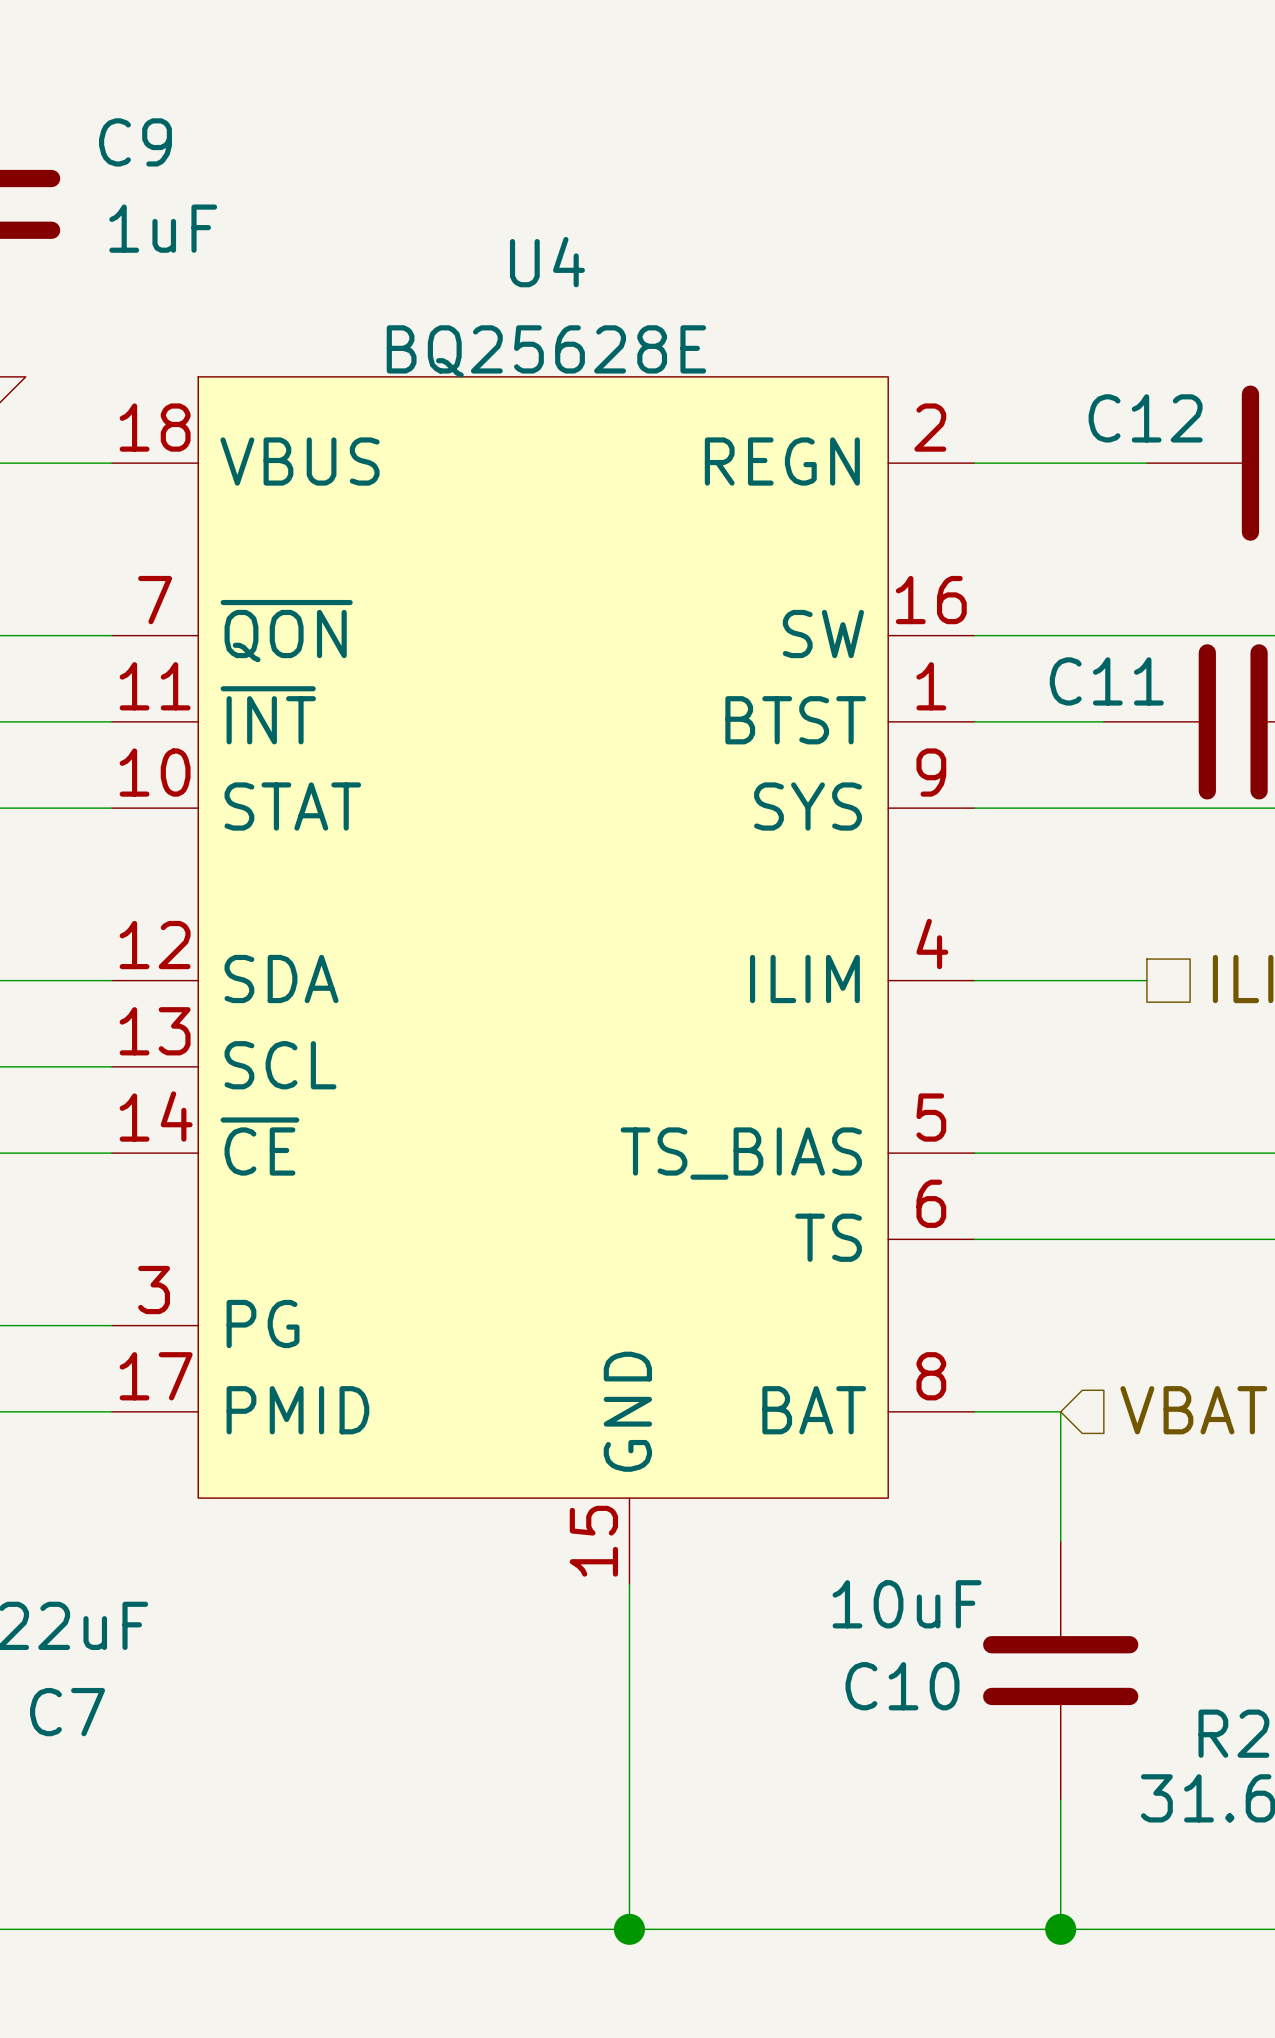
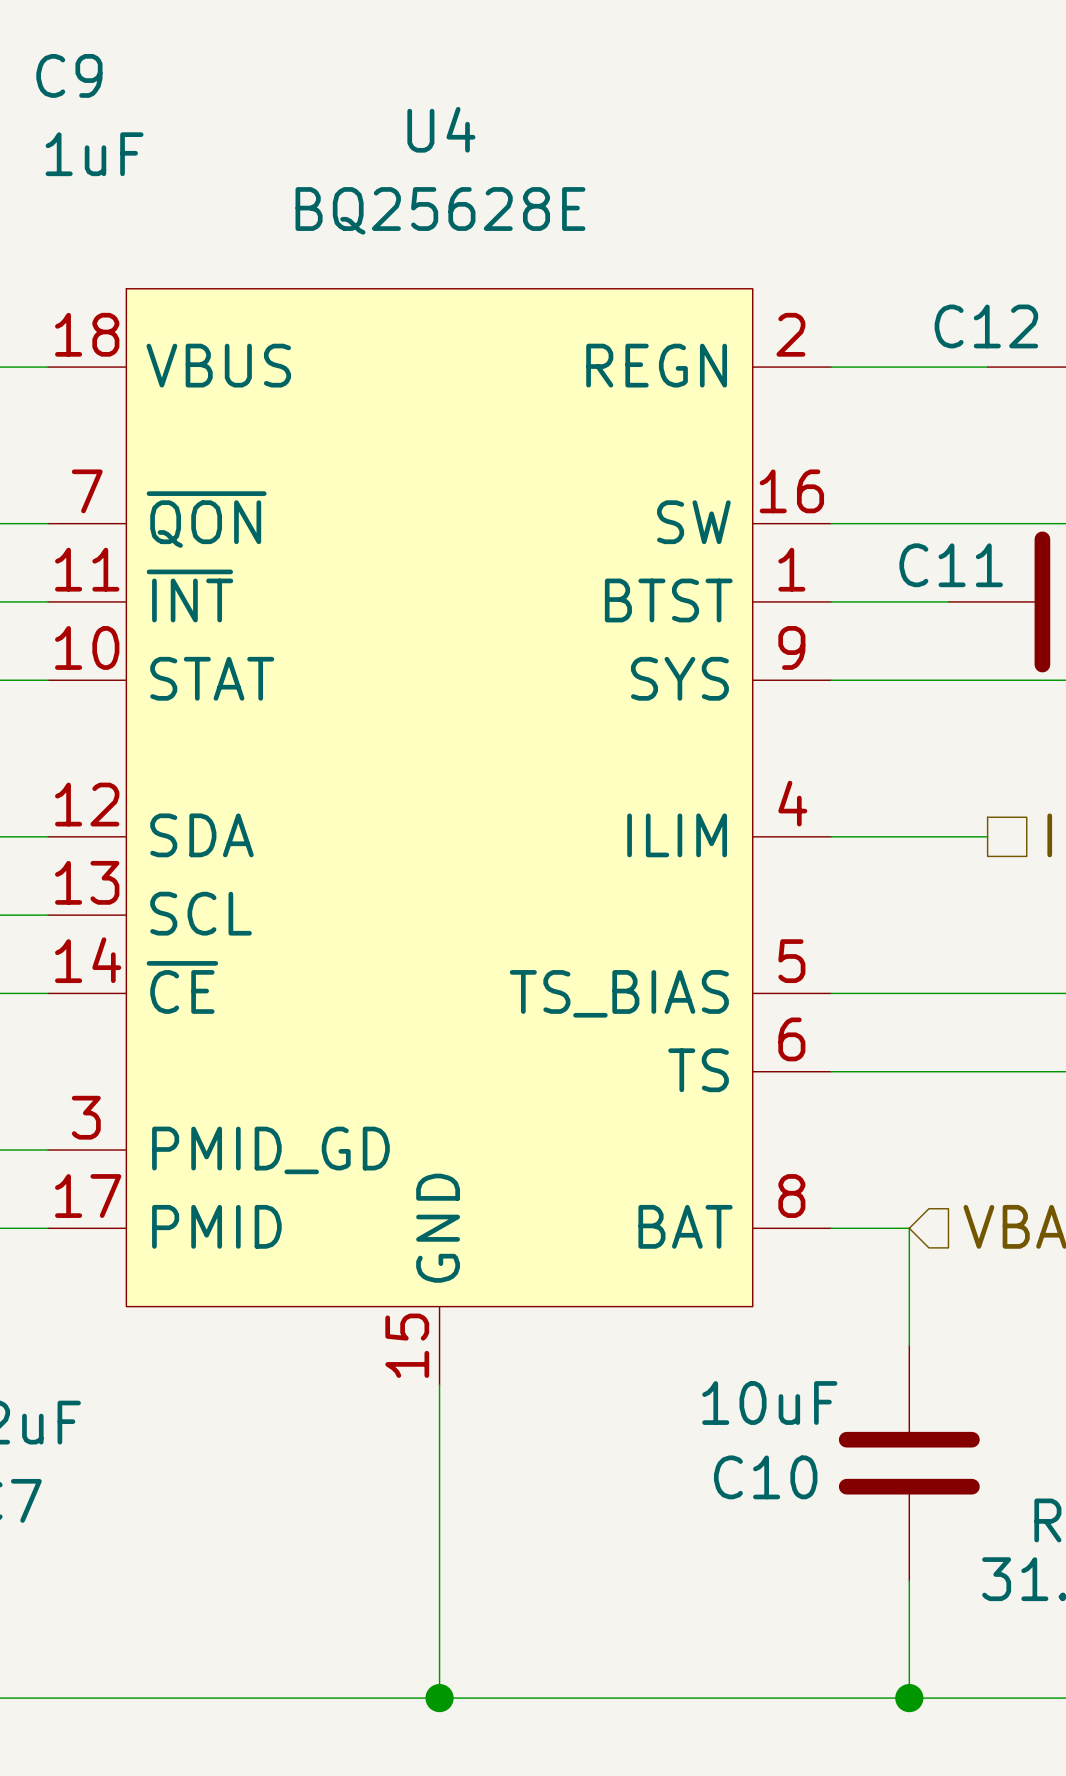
U4 symbol: [111, 376, 975, 1585] -> [48, 288, 832, 1385]
wire: (629, 1584) (629, 1929) -> (439, 1384) (439, 1698)
junction position: (629, 1929) -> (439, 1698)

